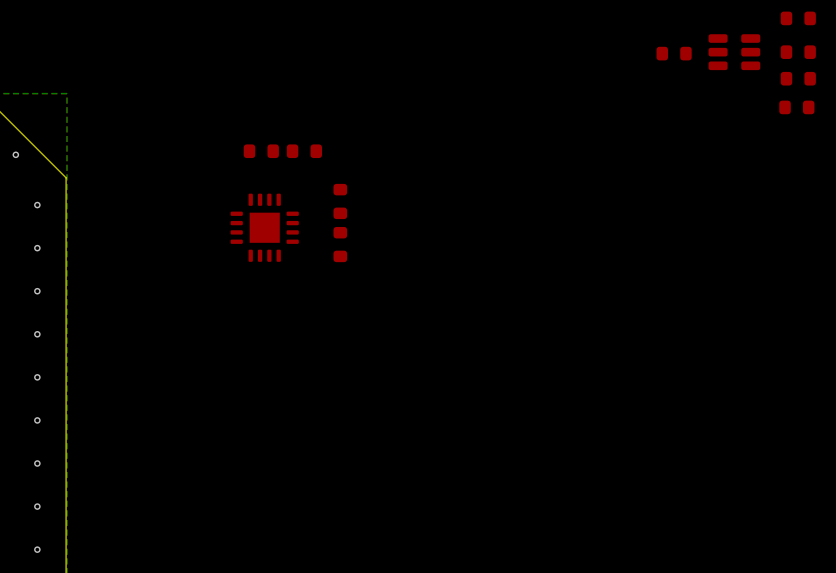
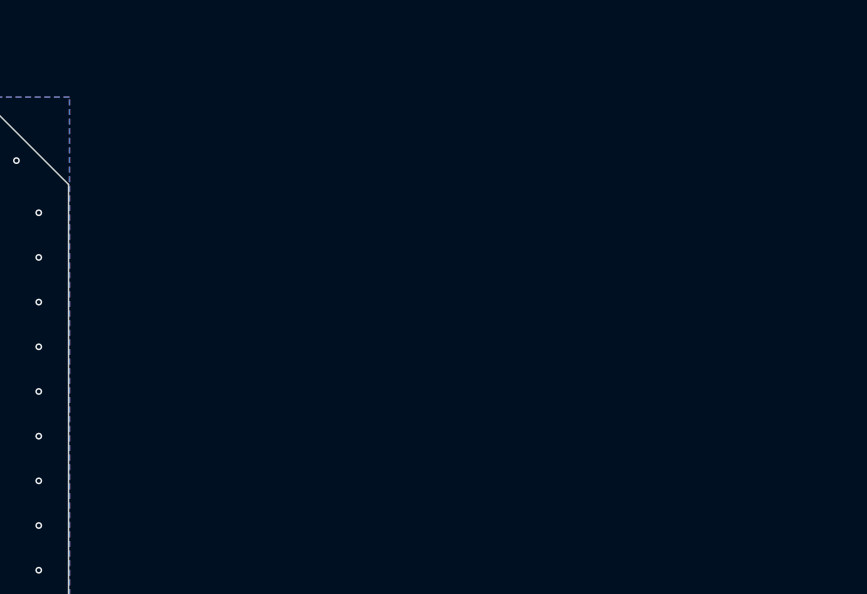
part: (798, 18) -> none
part: (734, 52) -> none
part: (798, 52) -> none
part: (674, 53) -> none
part: (798, 78) -> none
part: (796, 107) -> none
part: (261, 151) -> none
part: (304, 151) -> none
part: (340, 201) -> none
part: (264, 227) -> none
part: (340, 244) -> none

